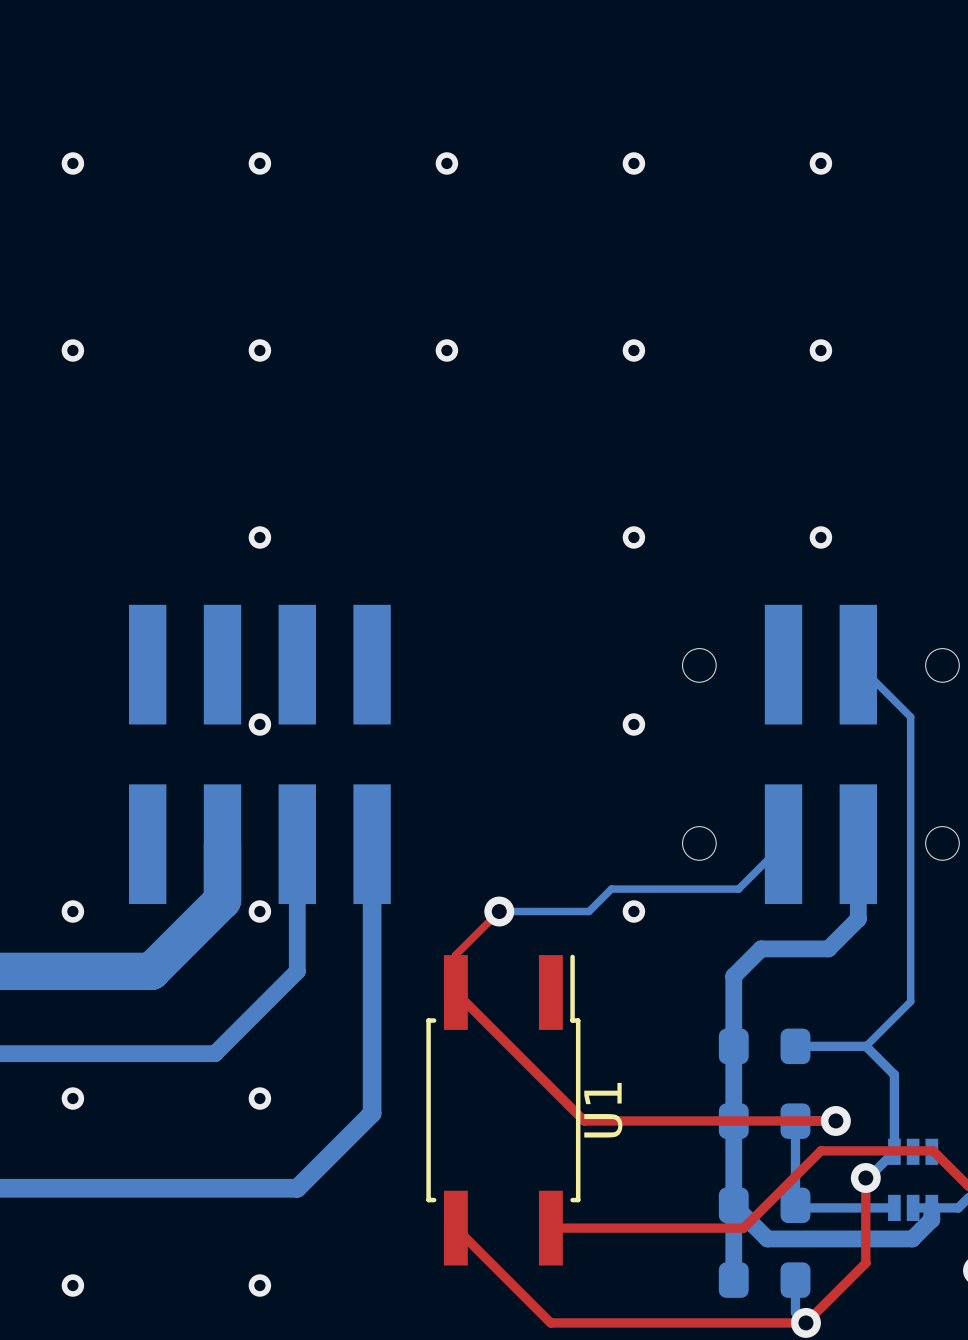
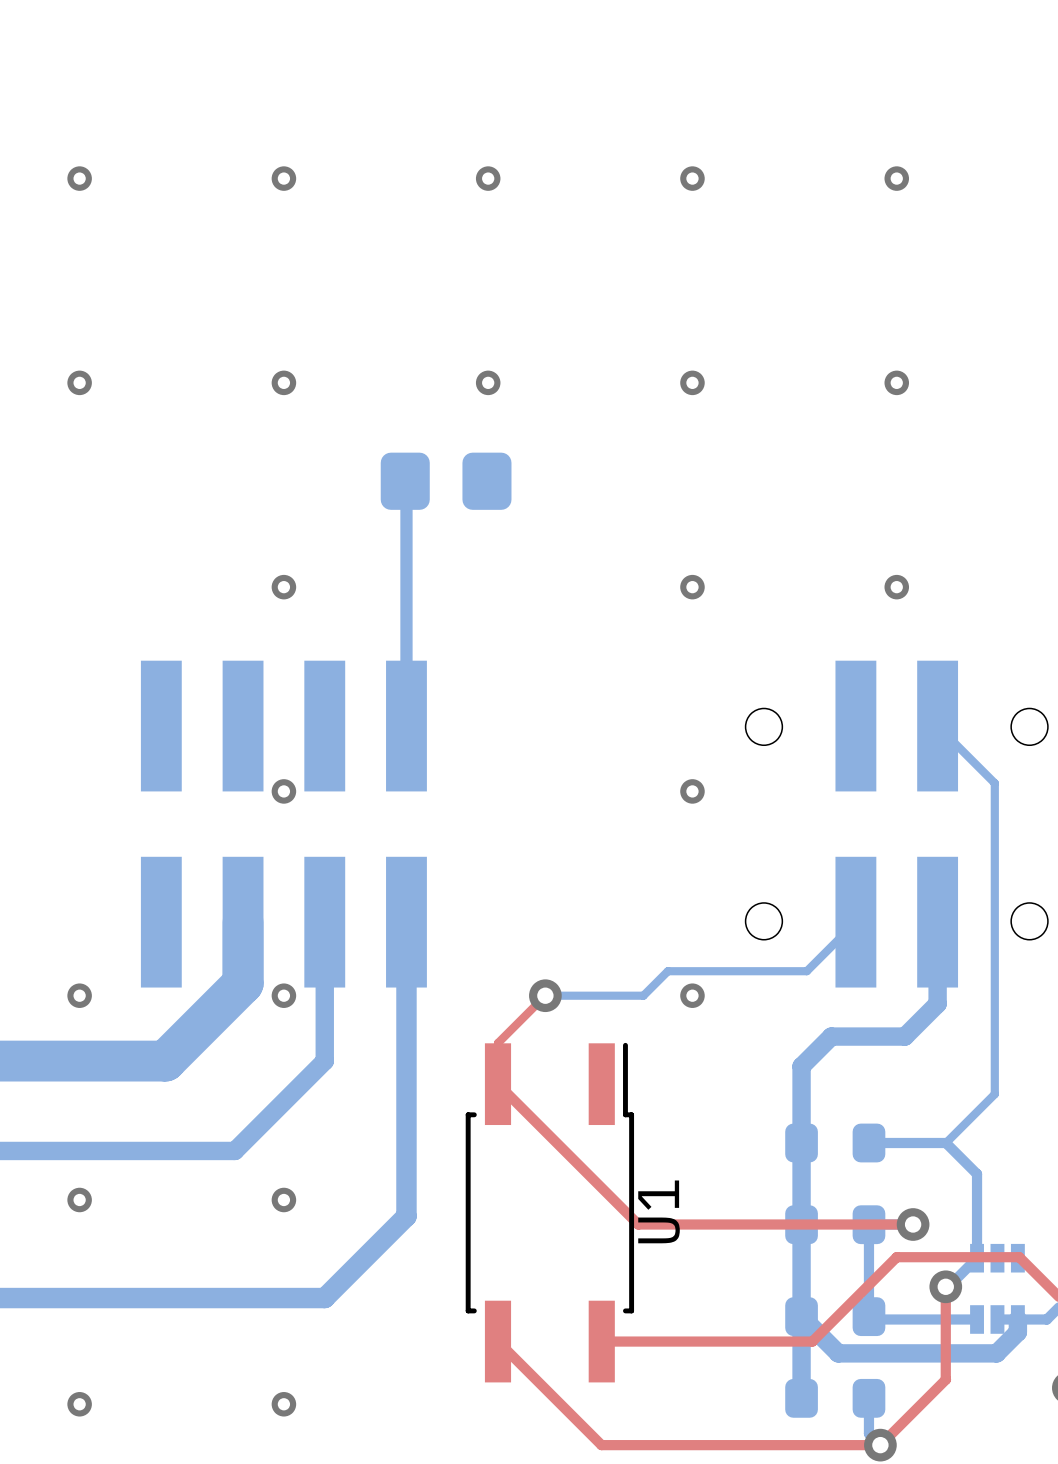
bottom track: none -> (405, 481) (406, 726)
part: none -> (446, 481)

